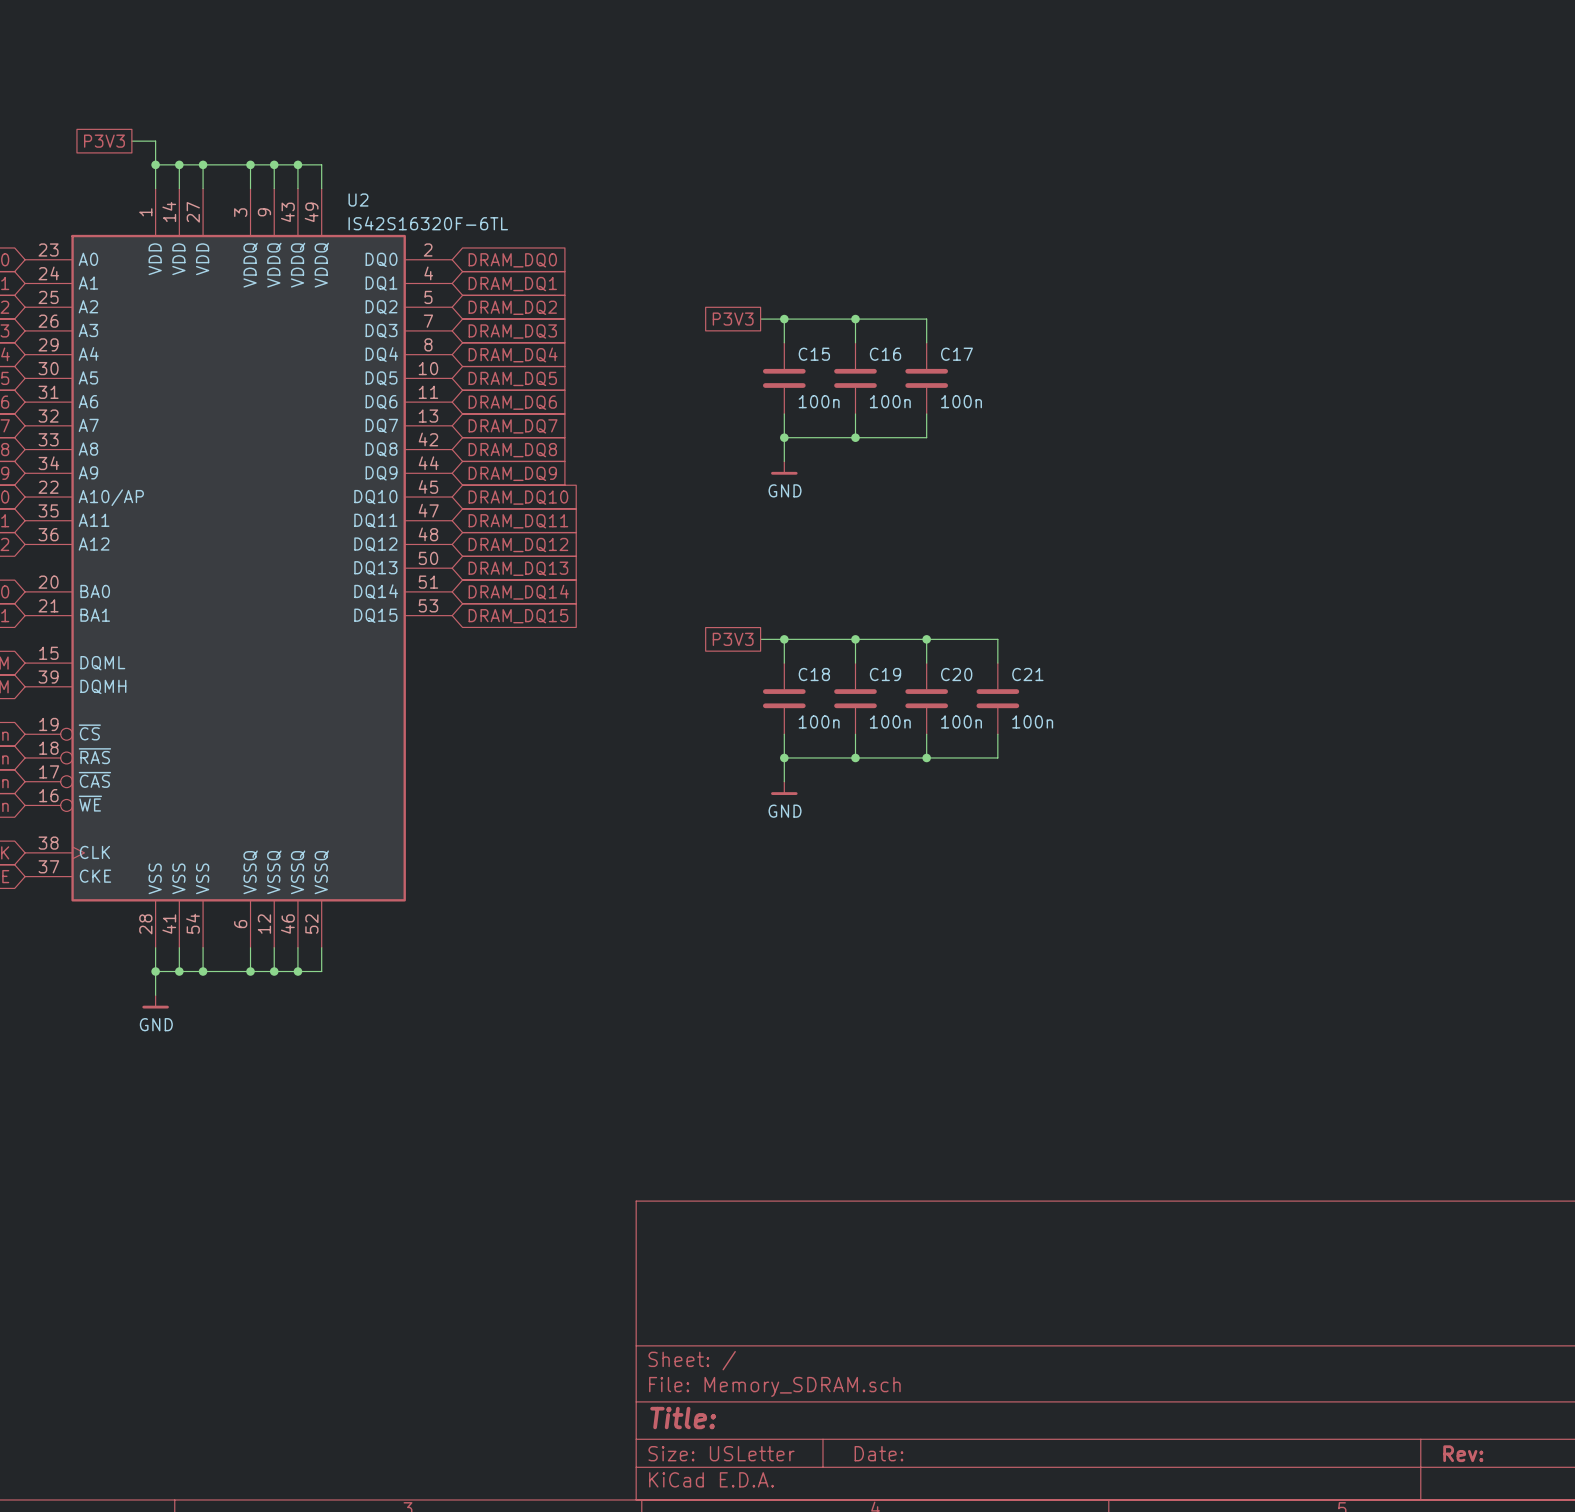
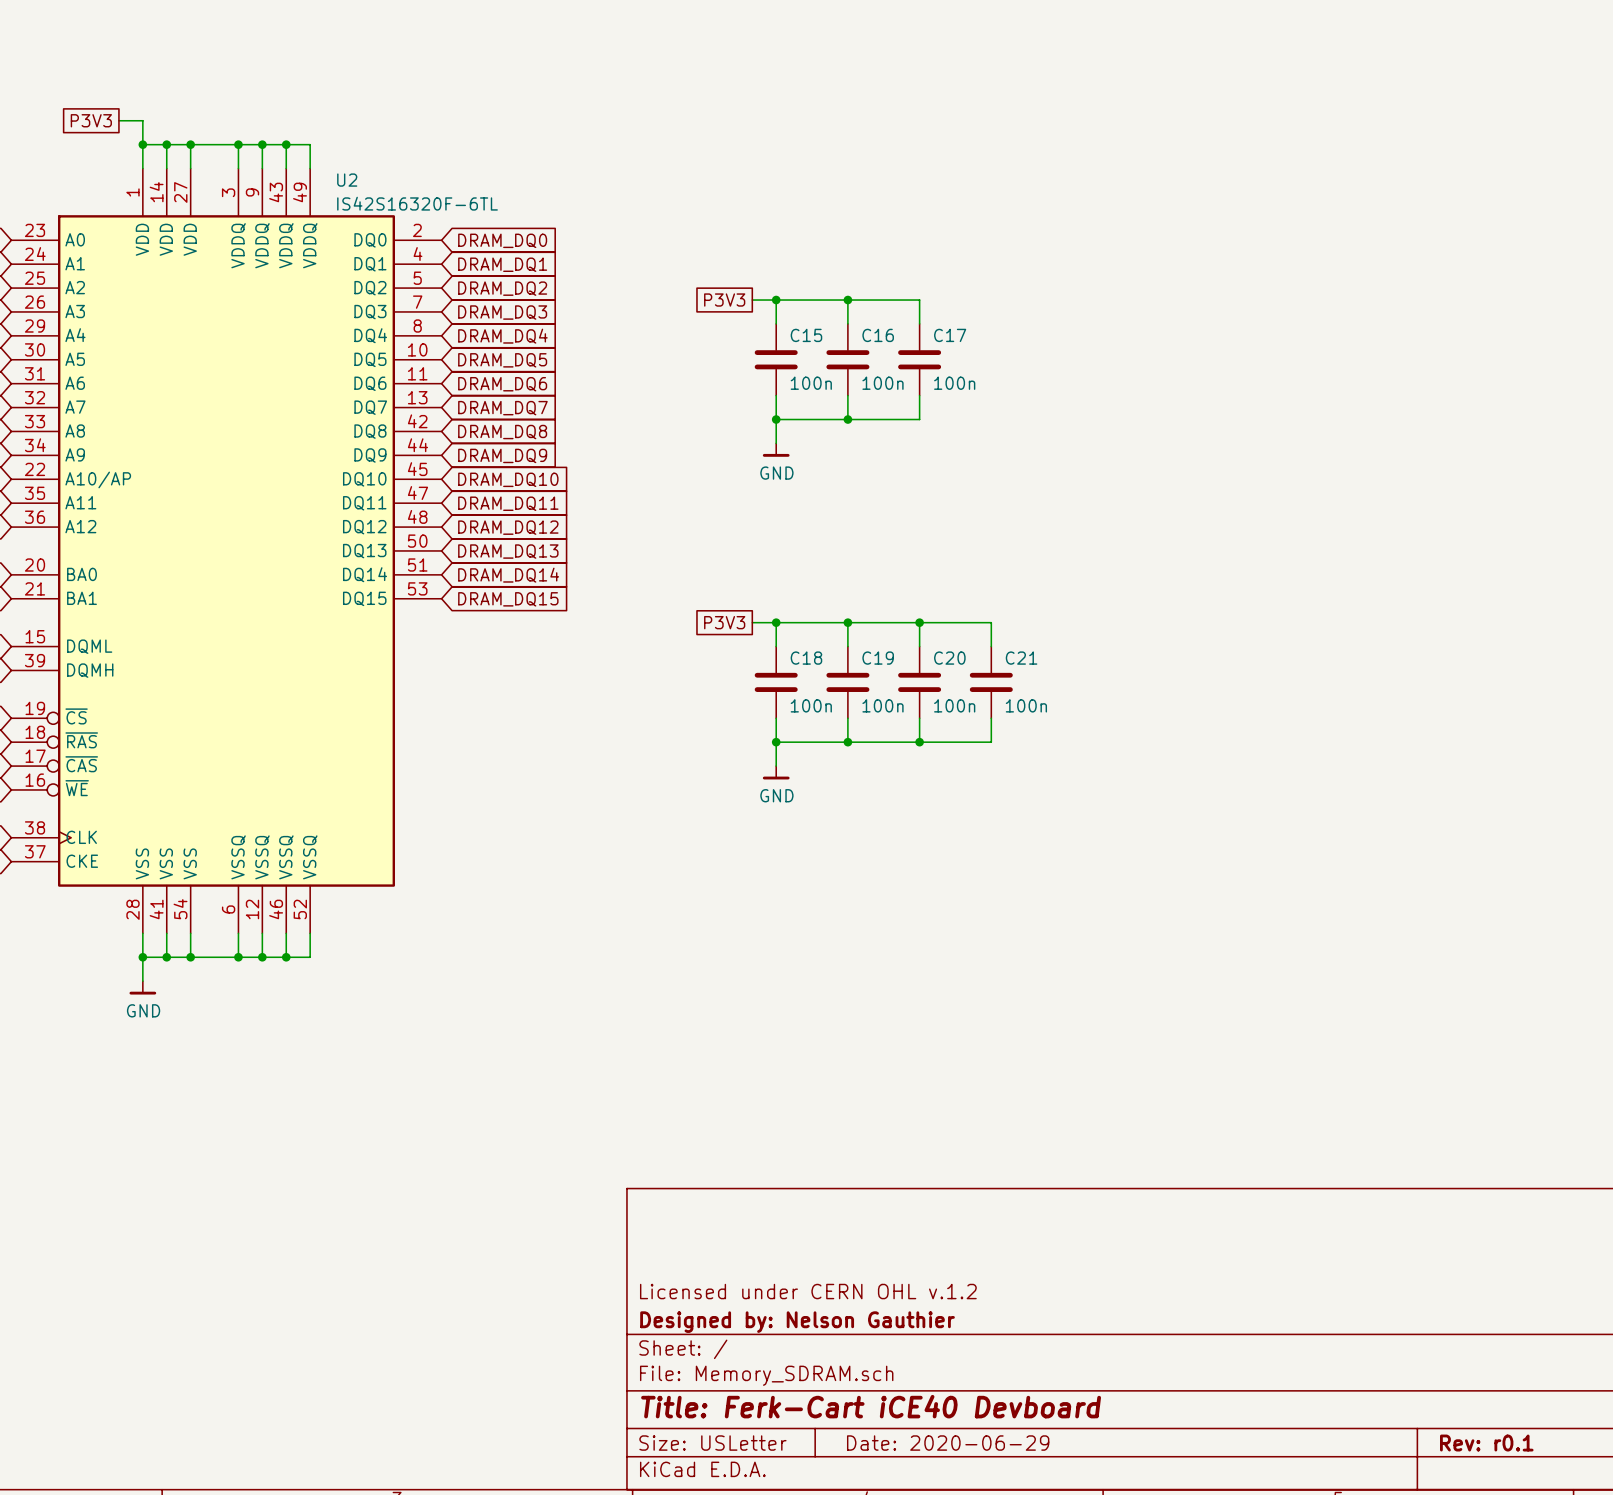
title block: none -> Licensed under CERN OHL v.1.2 (808, 1291)
title block: none -> Designed by: Nelson Gauthier (797, 1322)
title block: Title: (683, 1418) -> Title: Ferk-Cart iCE40 Devboard (871, 1406)
title block: Date: (878, 1453) -> Date: 2020-06-29 (948, 1443)
title block: Rev: (1463, 1453) -> Rev: r0.1 (1486, 1443)

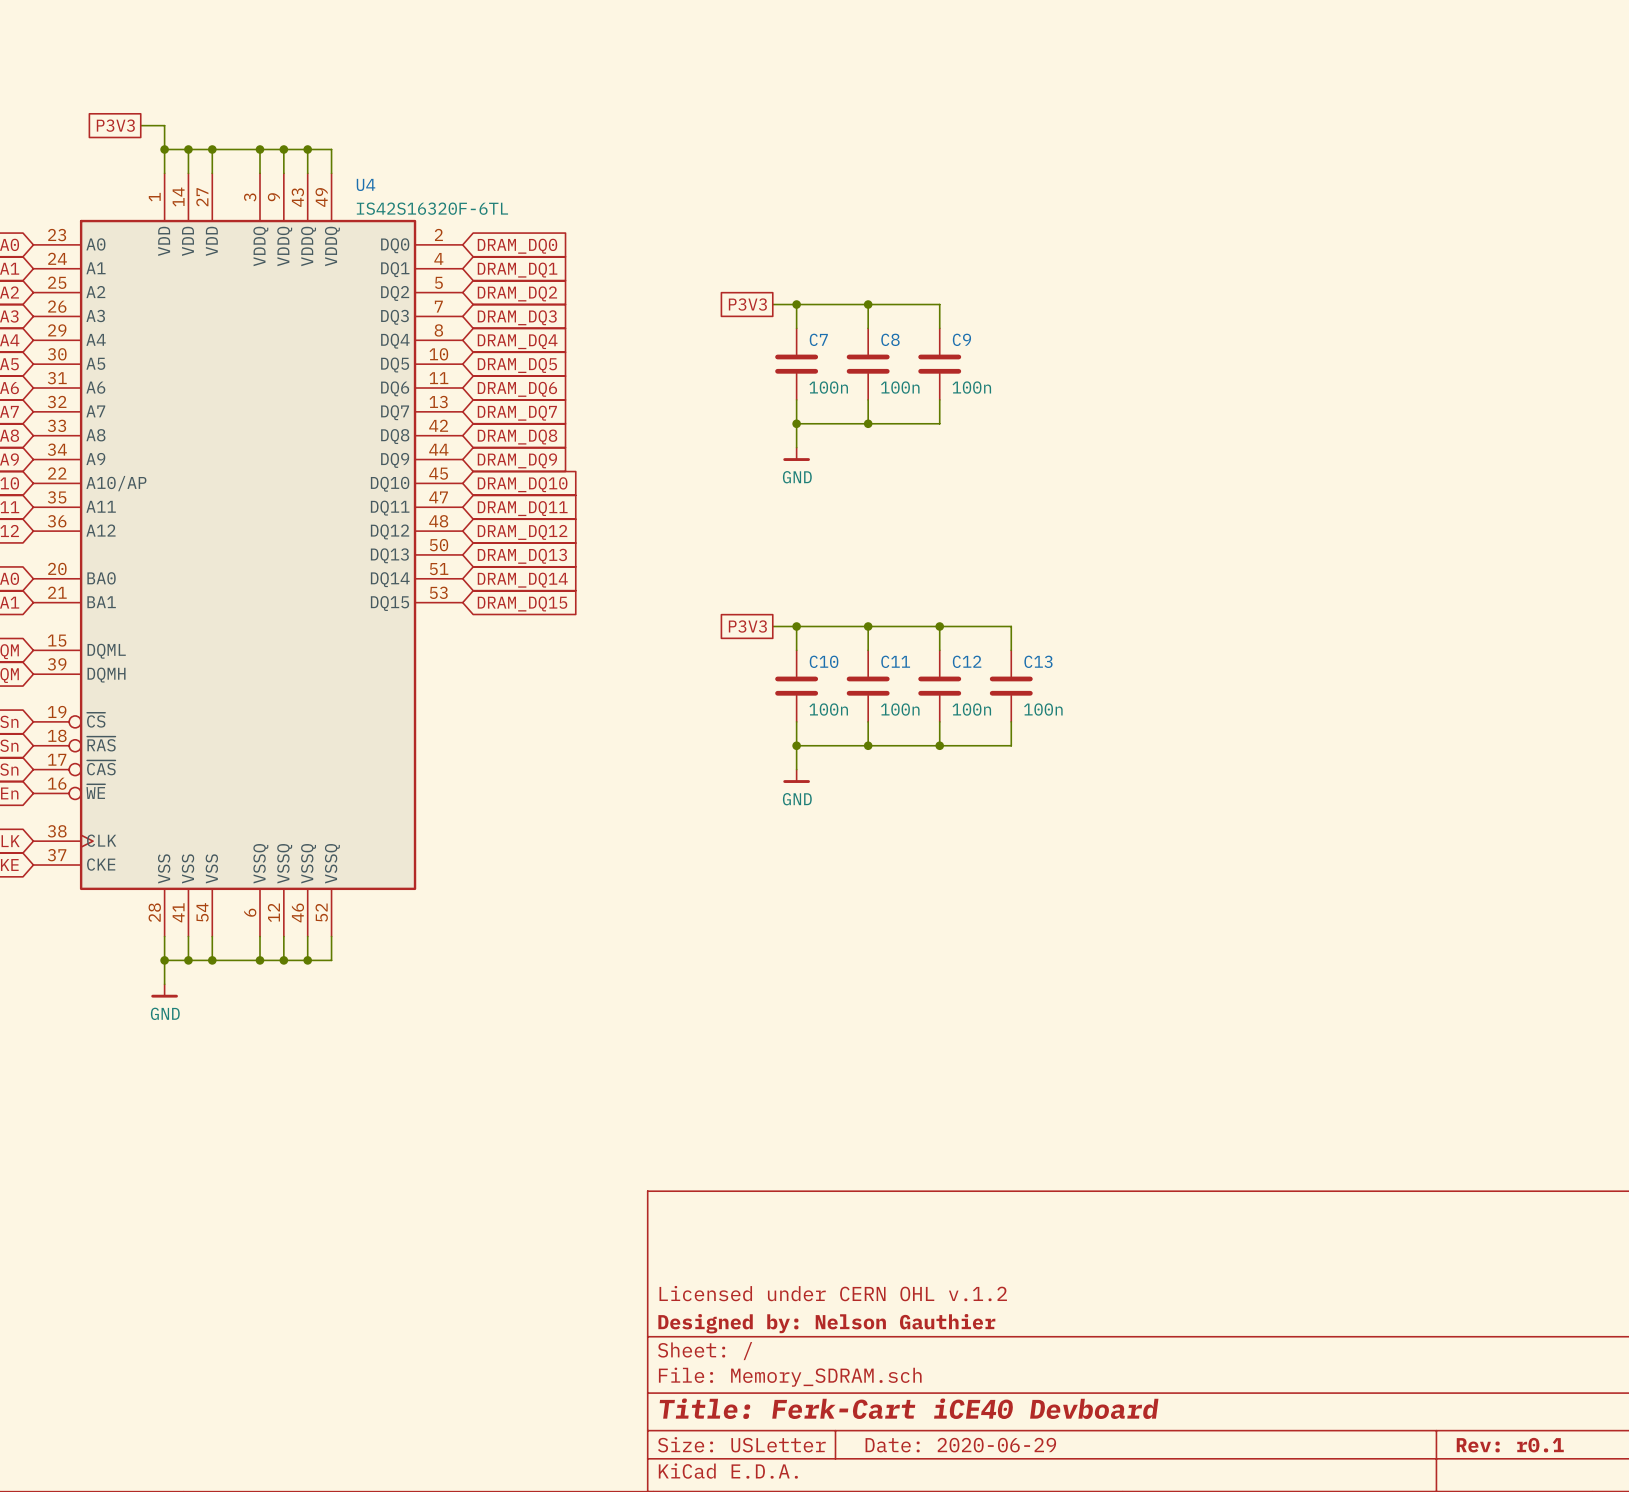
U2 name: U2 (347, 180) -> U4 (366, 184)
C15 name: C15 (806, 335) -> C7 (818, 339)
C16 name: C16 (878, 335) -> C8 (890, 339)
C17 name: C17 (950, 335) -> C9 (961, 339)
C18 name: C18 (806, 658) -> C10 (824, 661)
C19 name: C19 (878, 658) -> C11 (895, 661)
C20 name: C20 (949, 658) -> C12 (967, 661)
C21 name: C21 (1021, 658) -> C13 (1038, 661)

